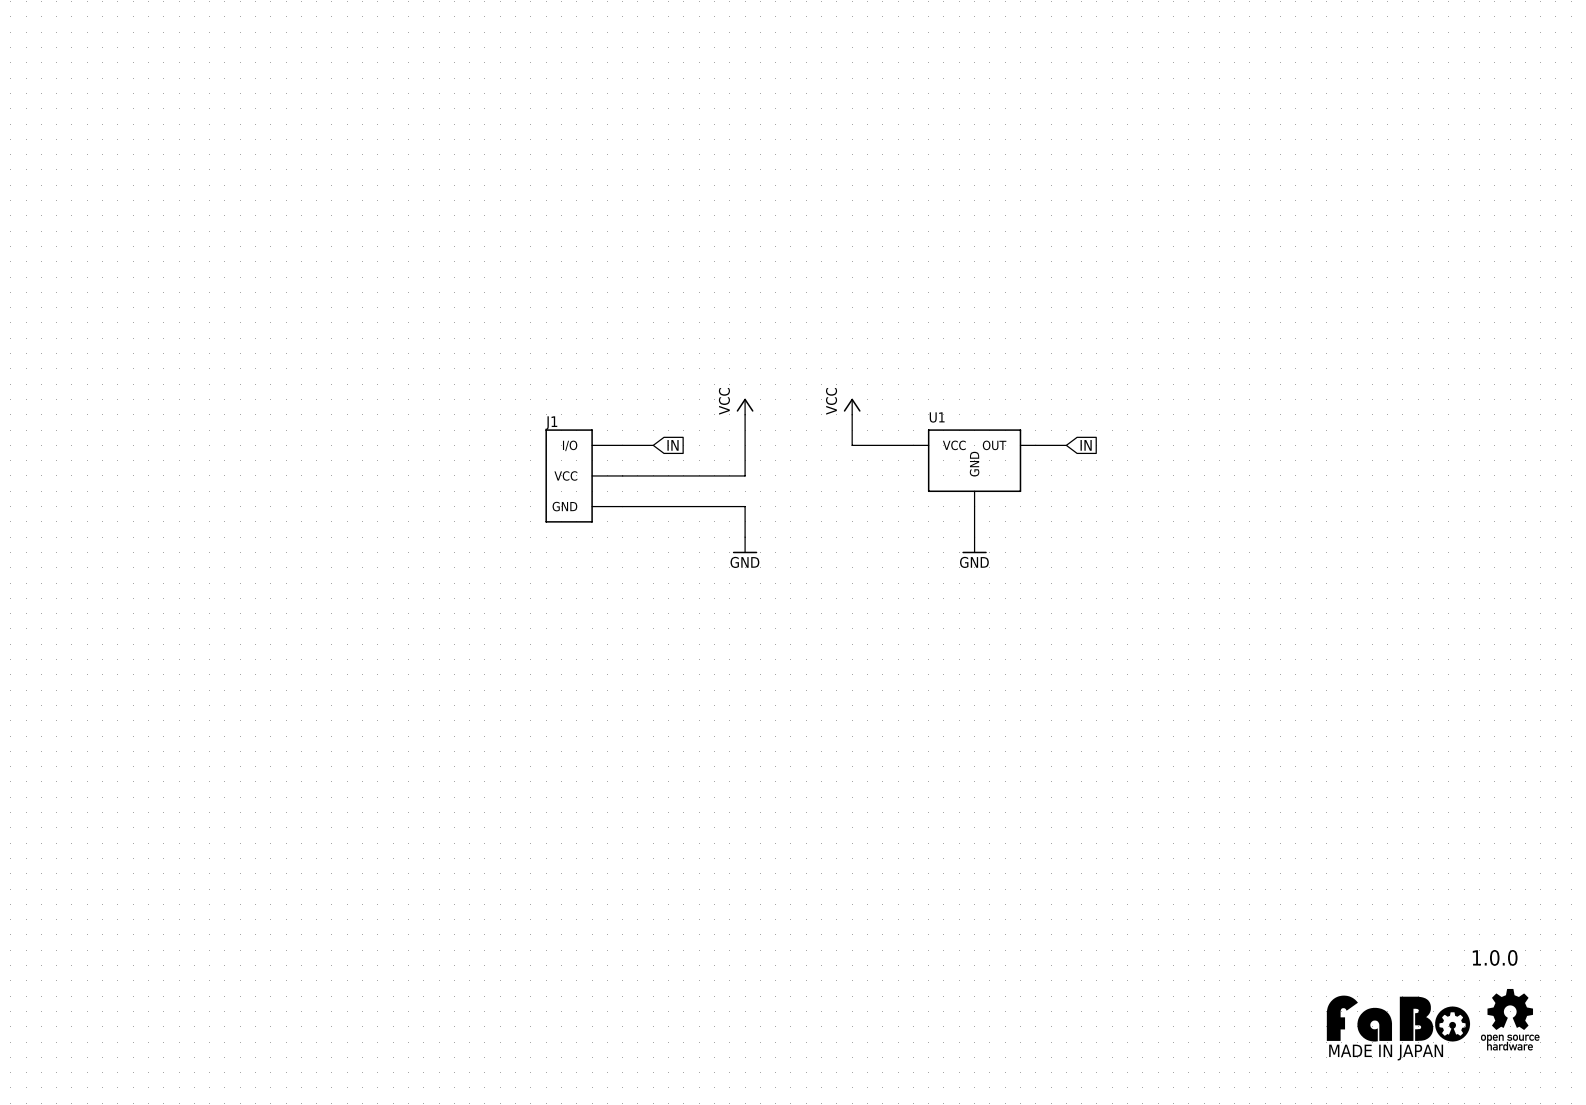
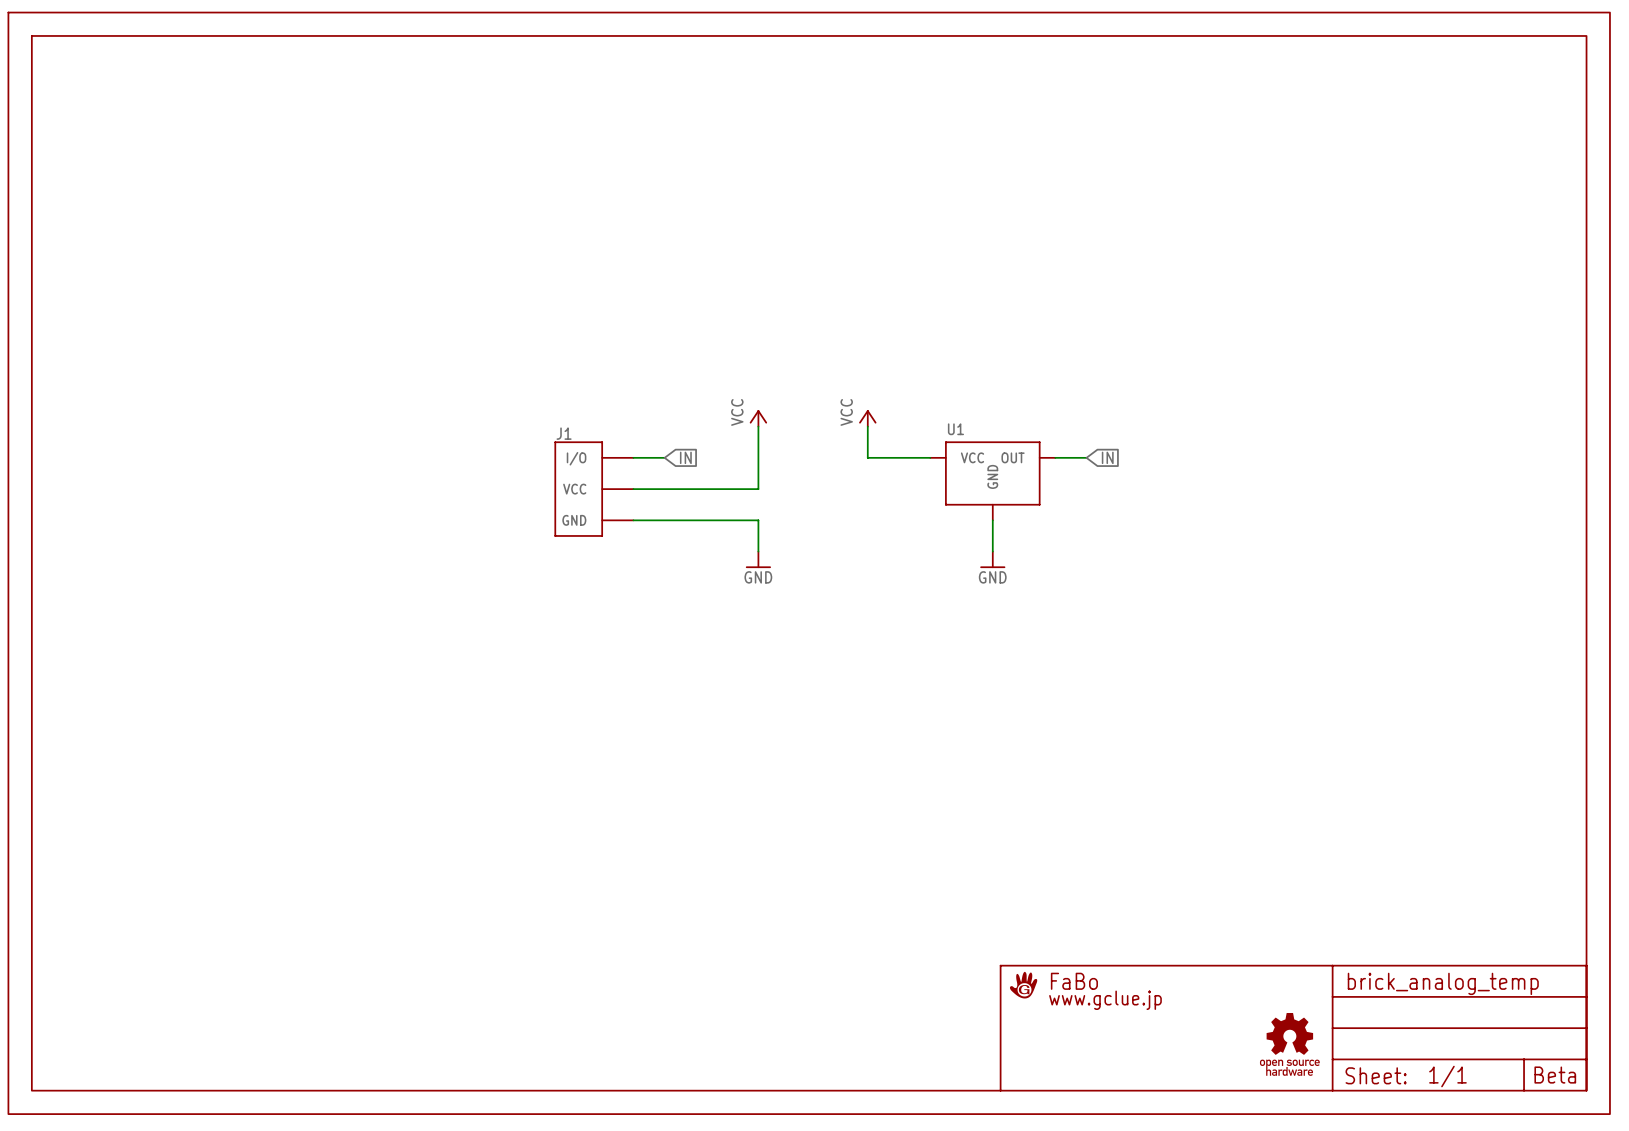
part: none -> (809, 563)
text: 1.0.0 (1495, 957) -> none
part: (1398, 1018) -> none
part: none -> (1289, 1044)
part: (1510, 1019) -> none
text: none -> Beta (1555, 1075)

